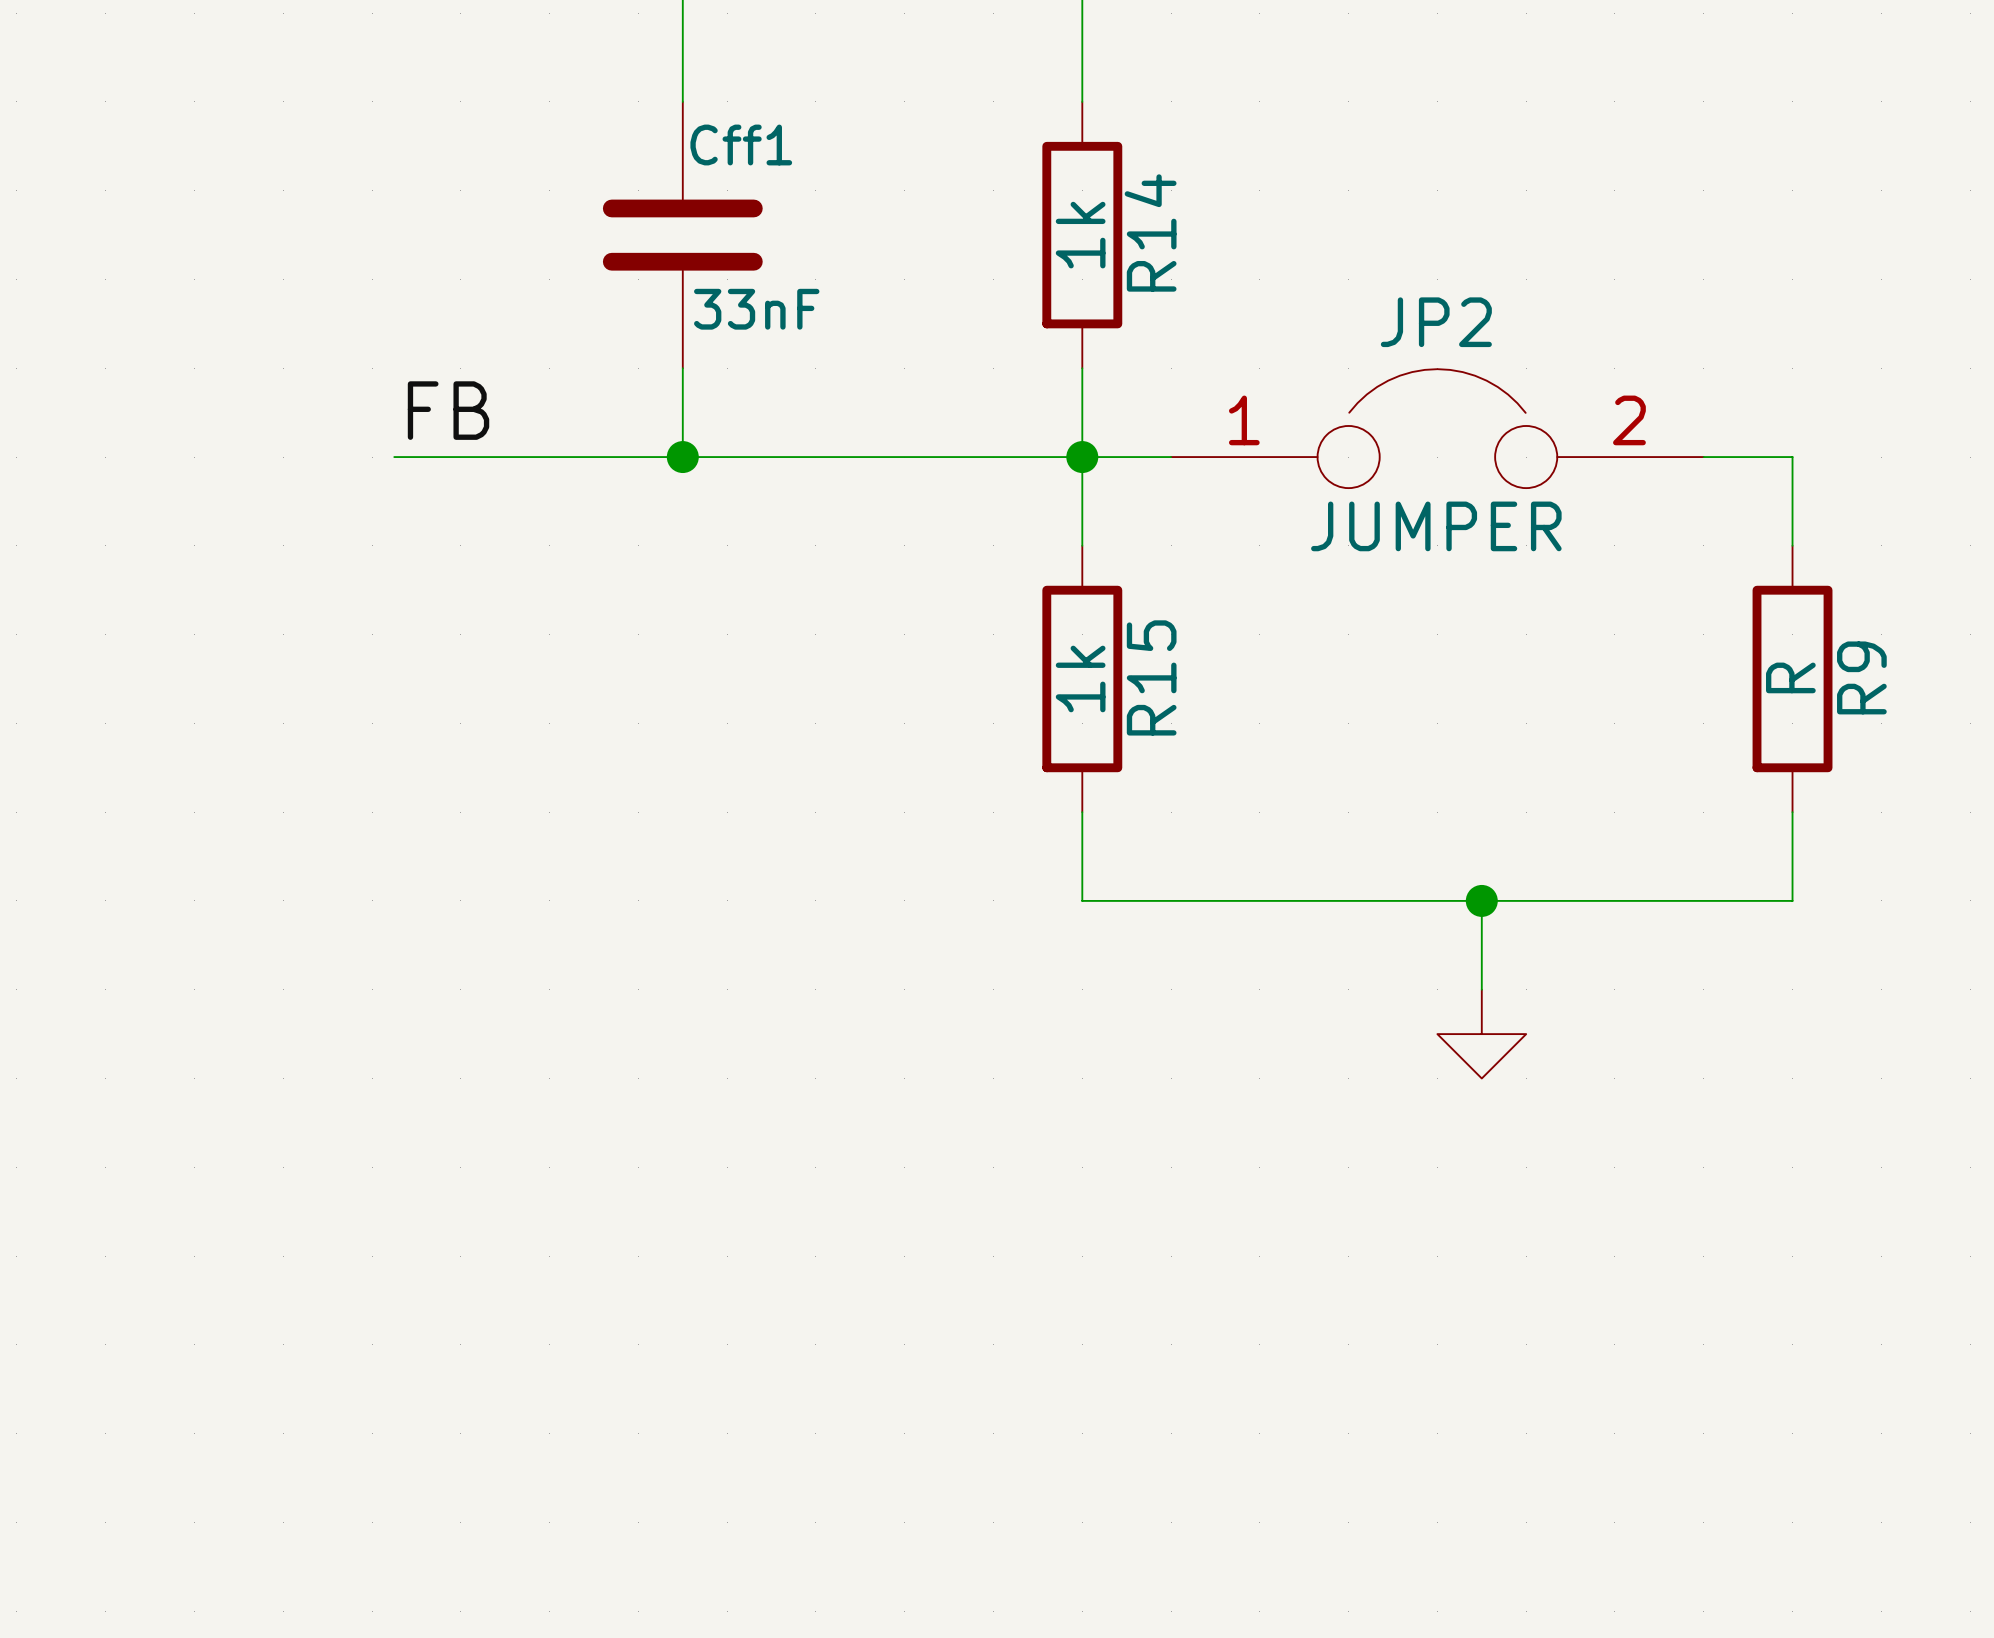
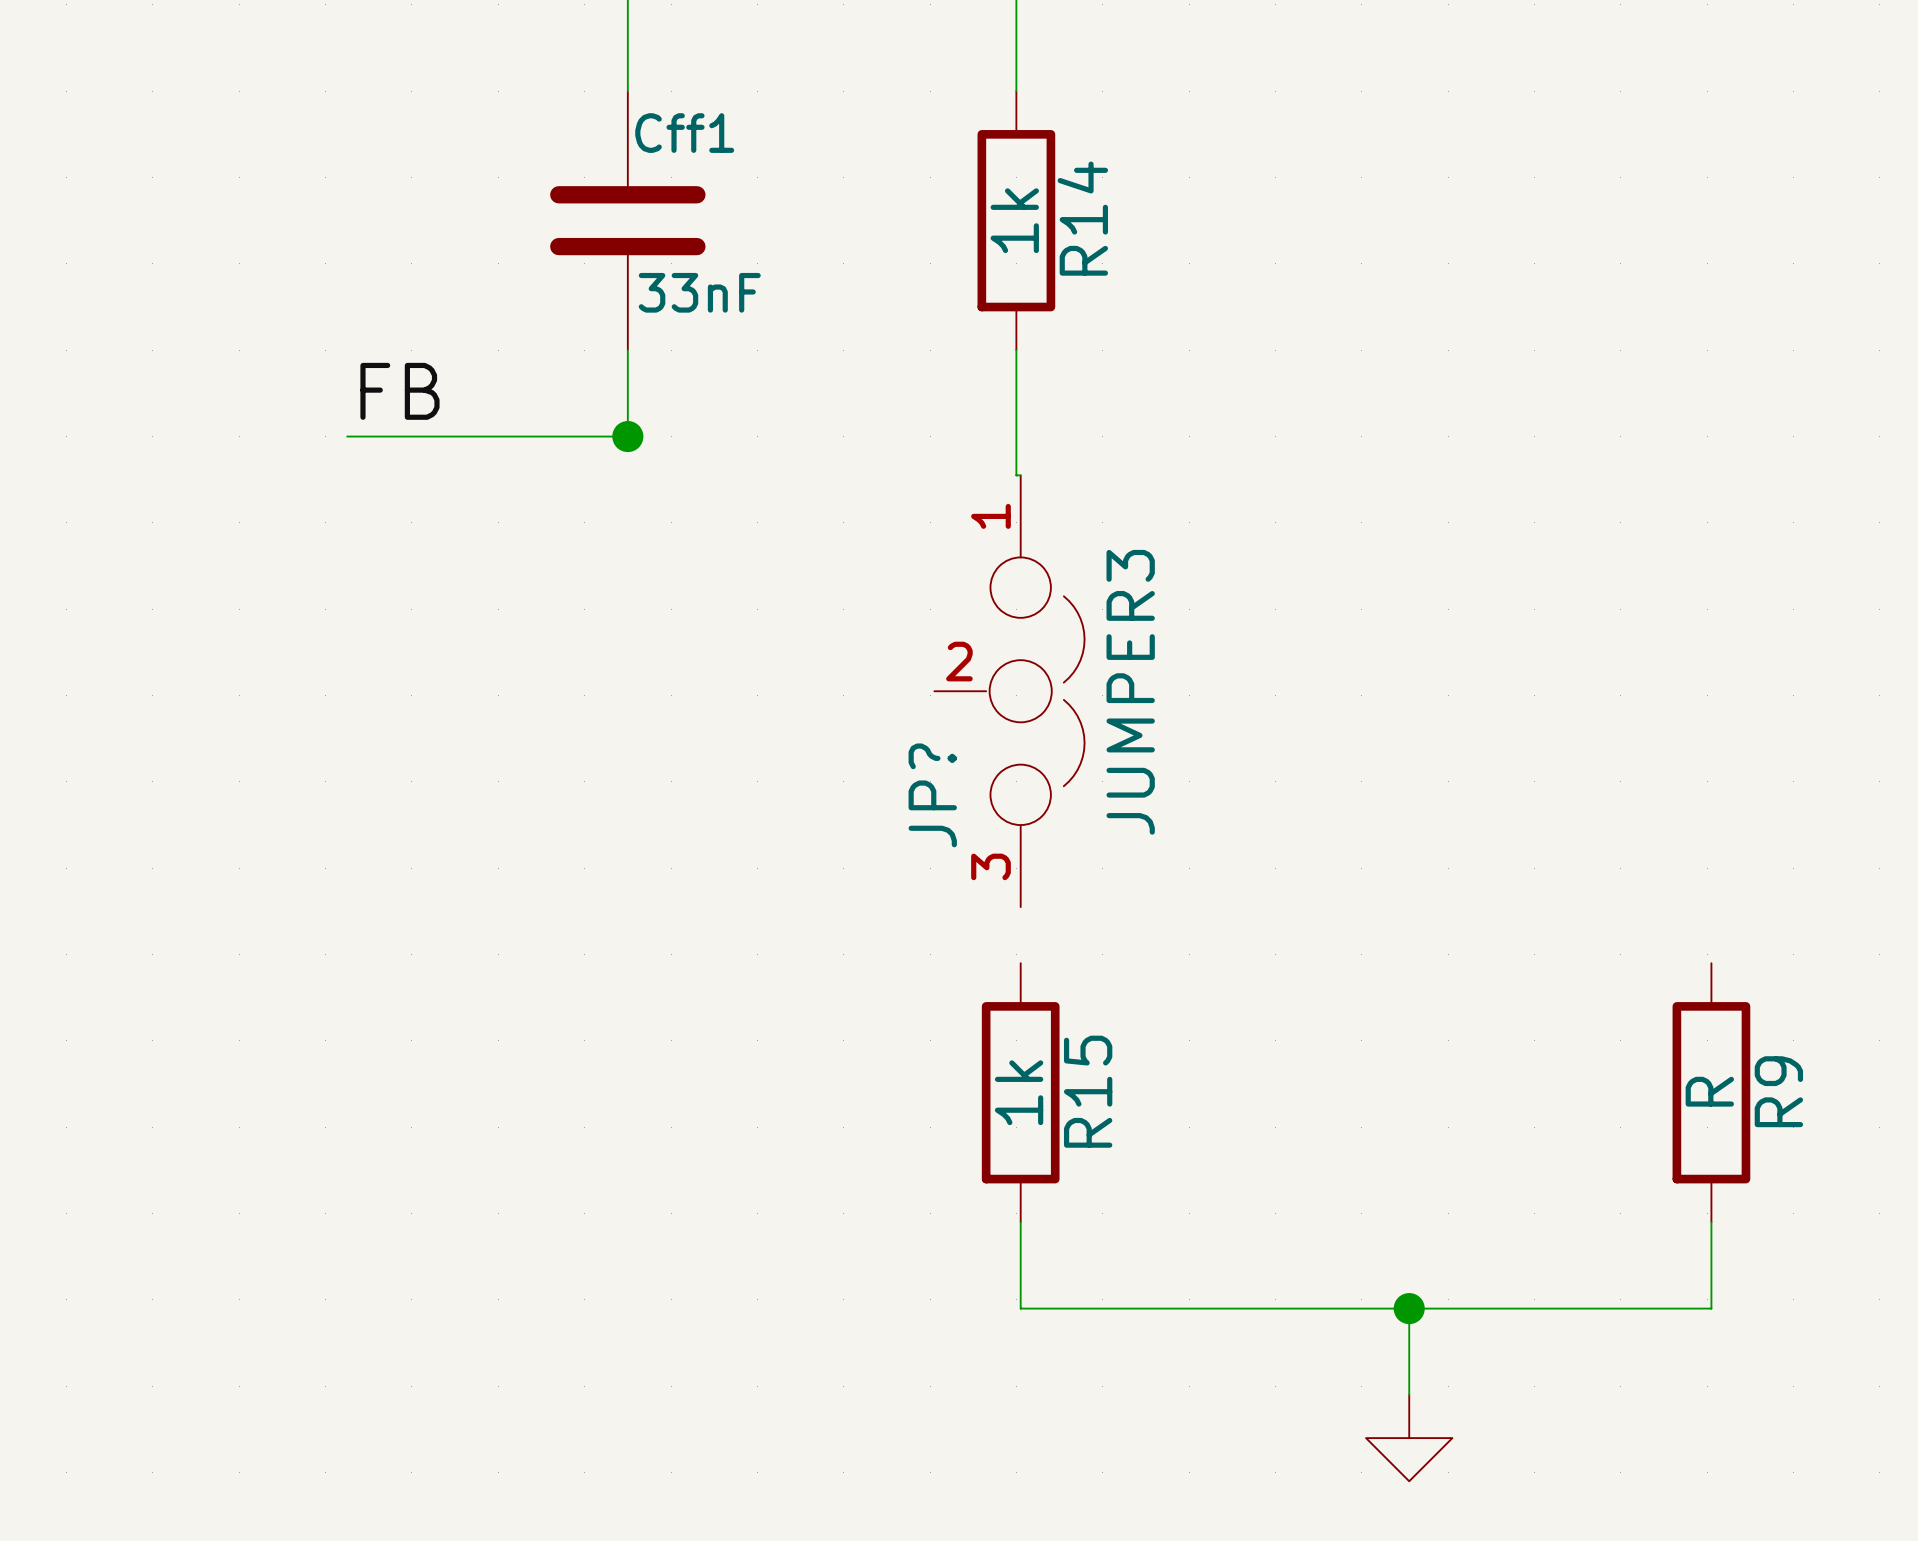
JP2: JUMPER (1437, 428) -> none
wire: (682, 457) (1171, 457) -> none
junction: (1082, 457) -> none
wire: (1703, 457) (1792, 457) (1792, 545) -> none
wire: (1082, 496) (1082, 545) -> (1016, 475) (1020, 475)
R15 position: (1082, 678) -> (1020, 1092)
R9 position: (1792, 678) -> (1711, 1092)
JP?: none -> JUMPER3 (1009, 691)
wire: (1082, 812) (1082, 900) (1792, 900) (1792, 812) -> (1020, 1222) (1020, 1308) (1711, 1308) (1711, 1222)
wire: (1481, 900) (1481, 989) -> (1409, 1308) (1409, 1394)
junction: (1481, 900) -> none
power symbol position: (1481, 1034) -> (1409, 1438)
junction: none -> (1409, 1308)

